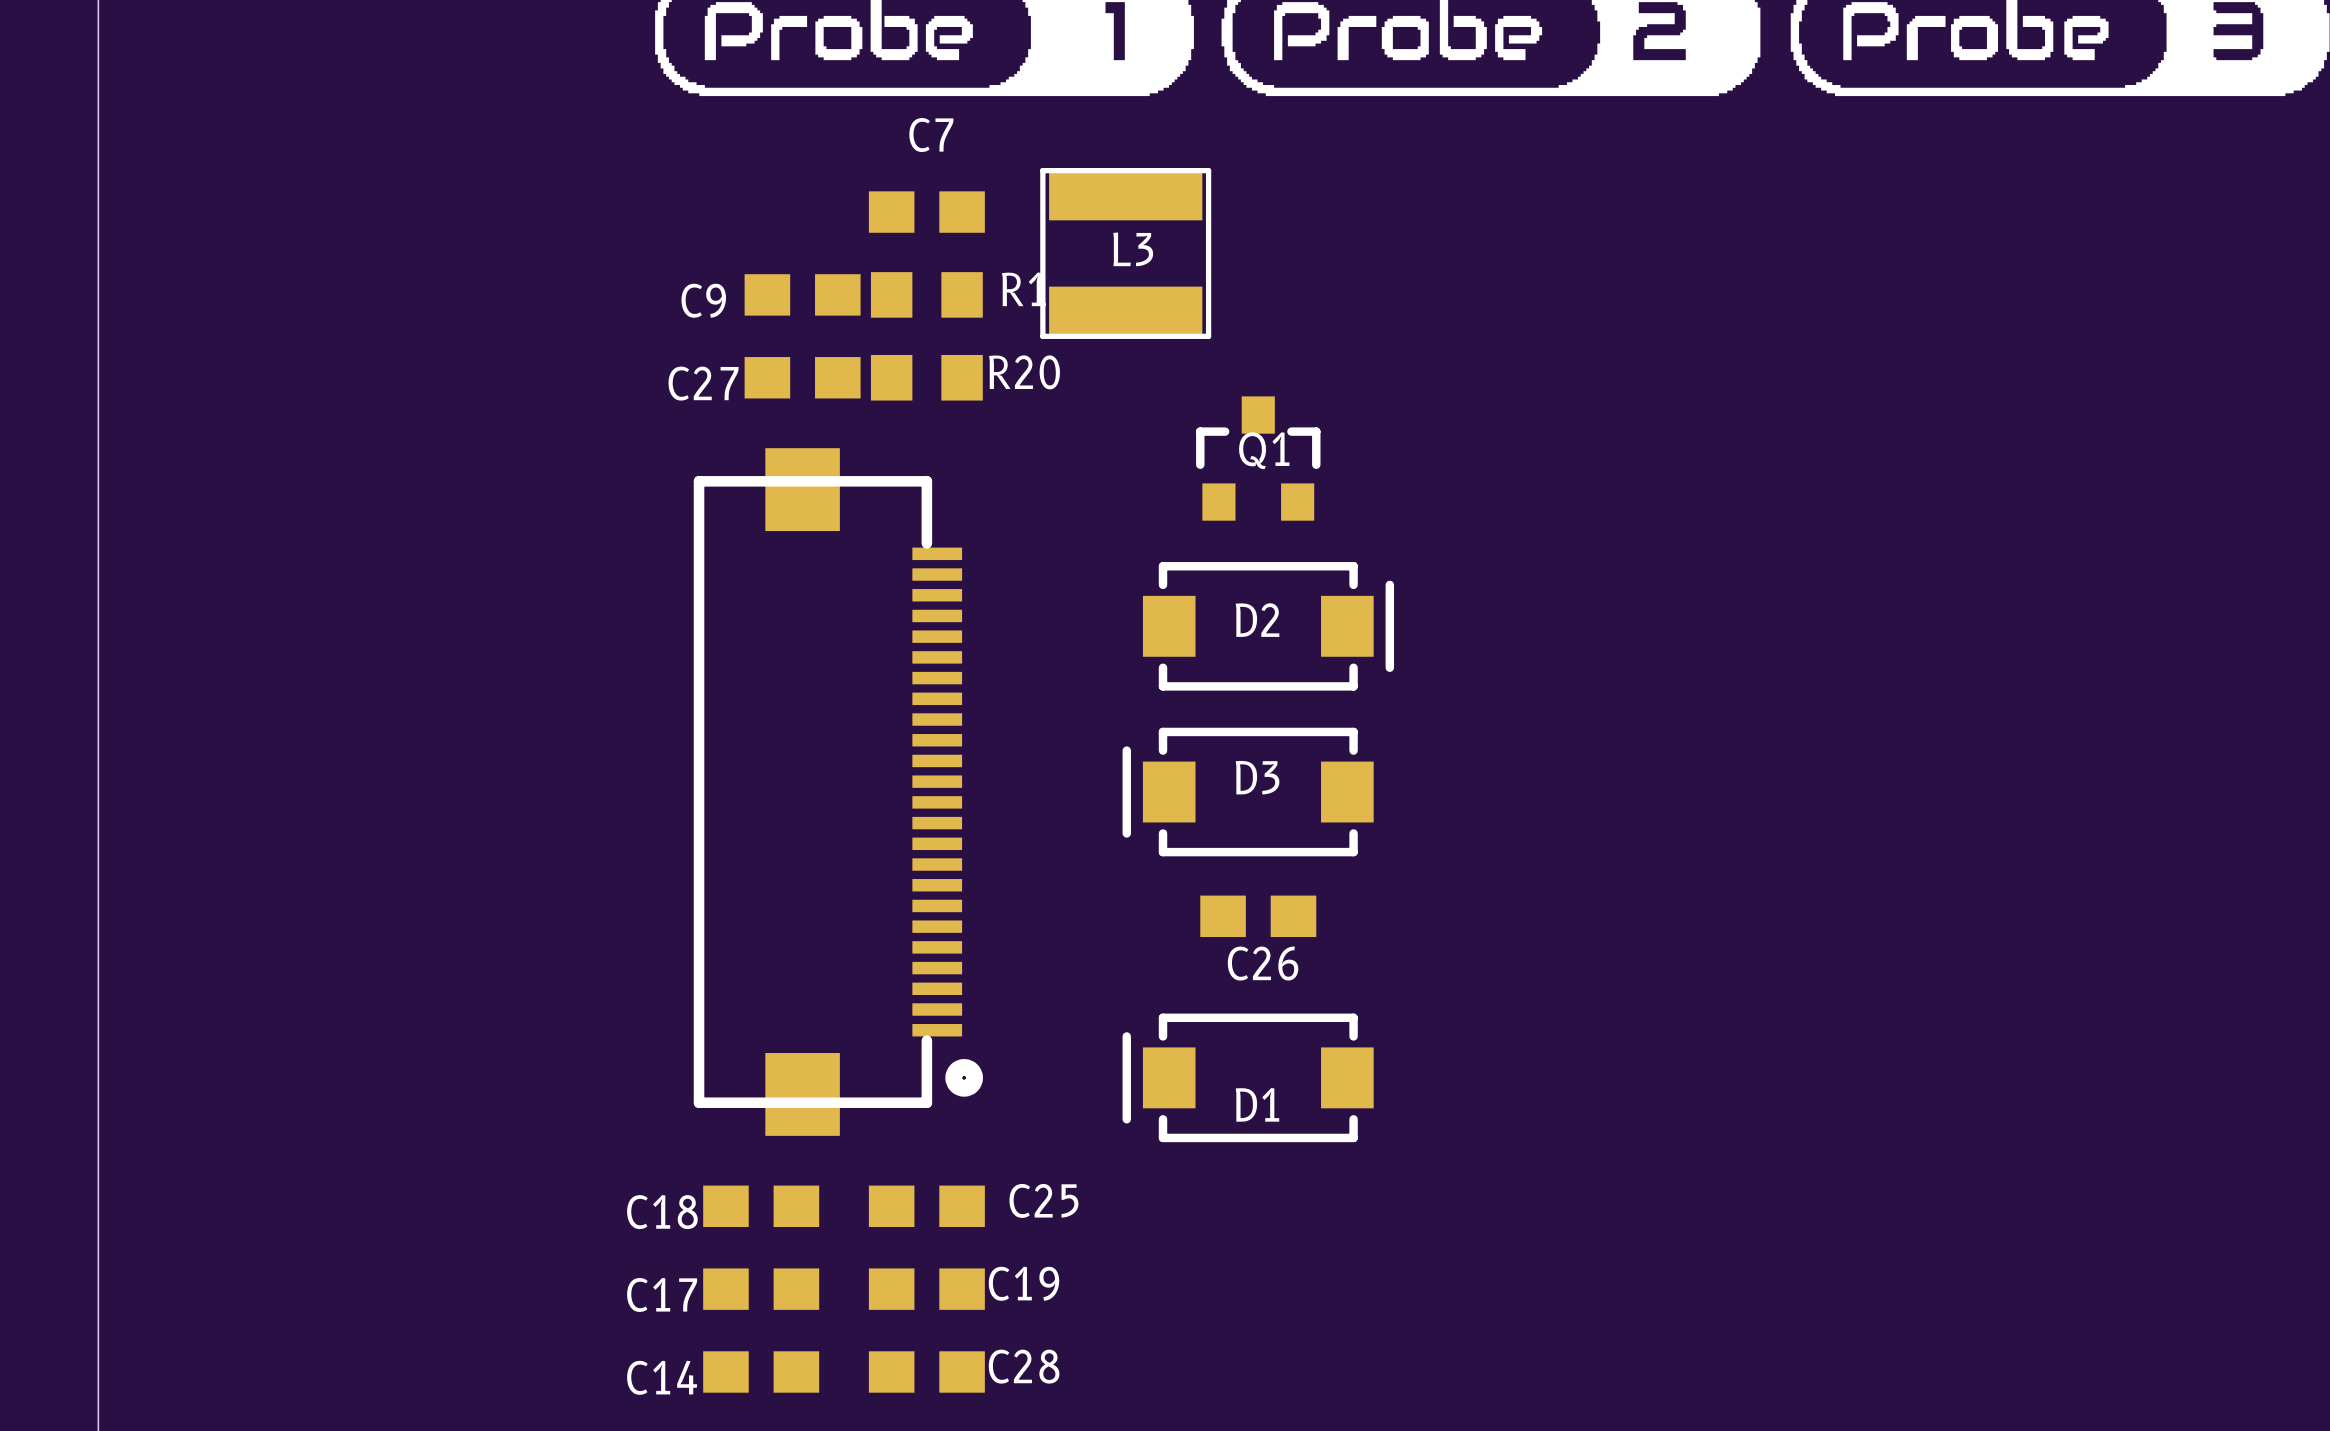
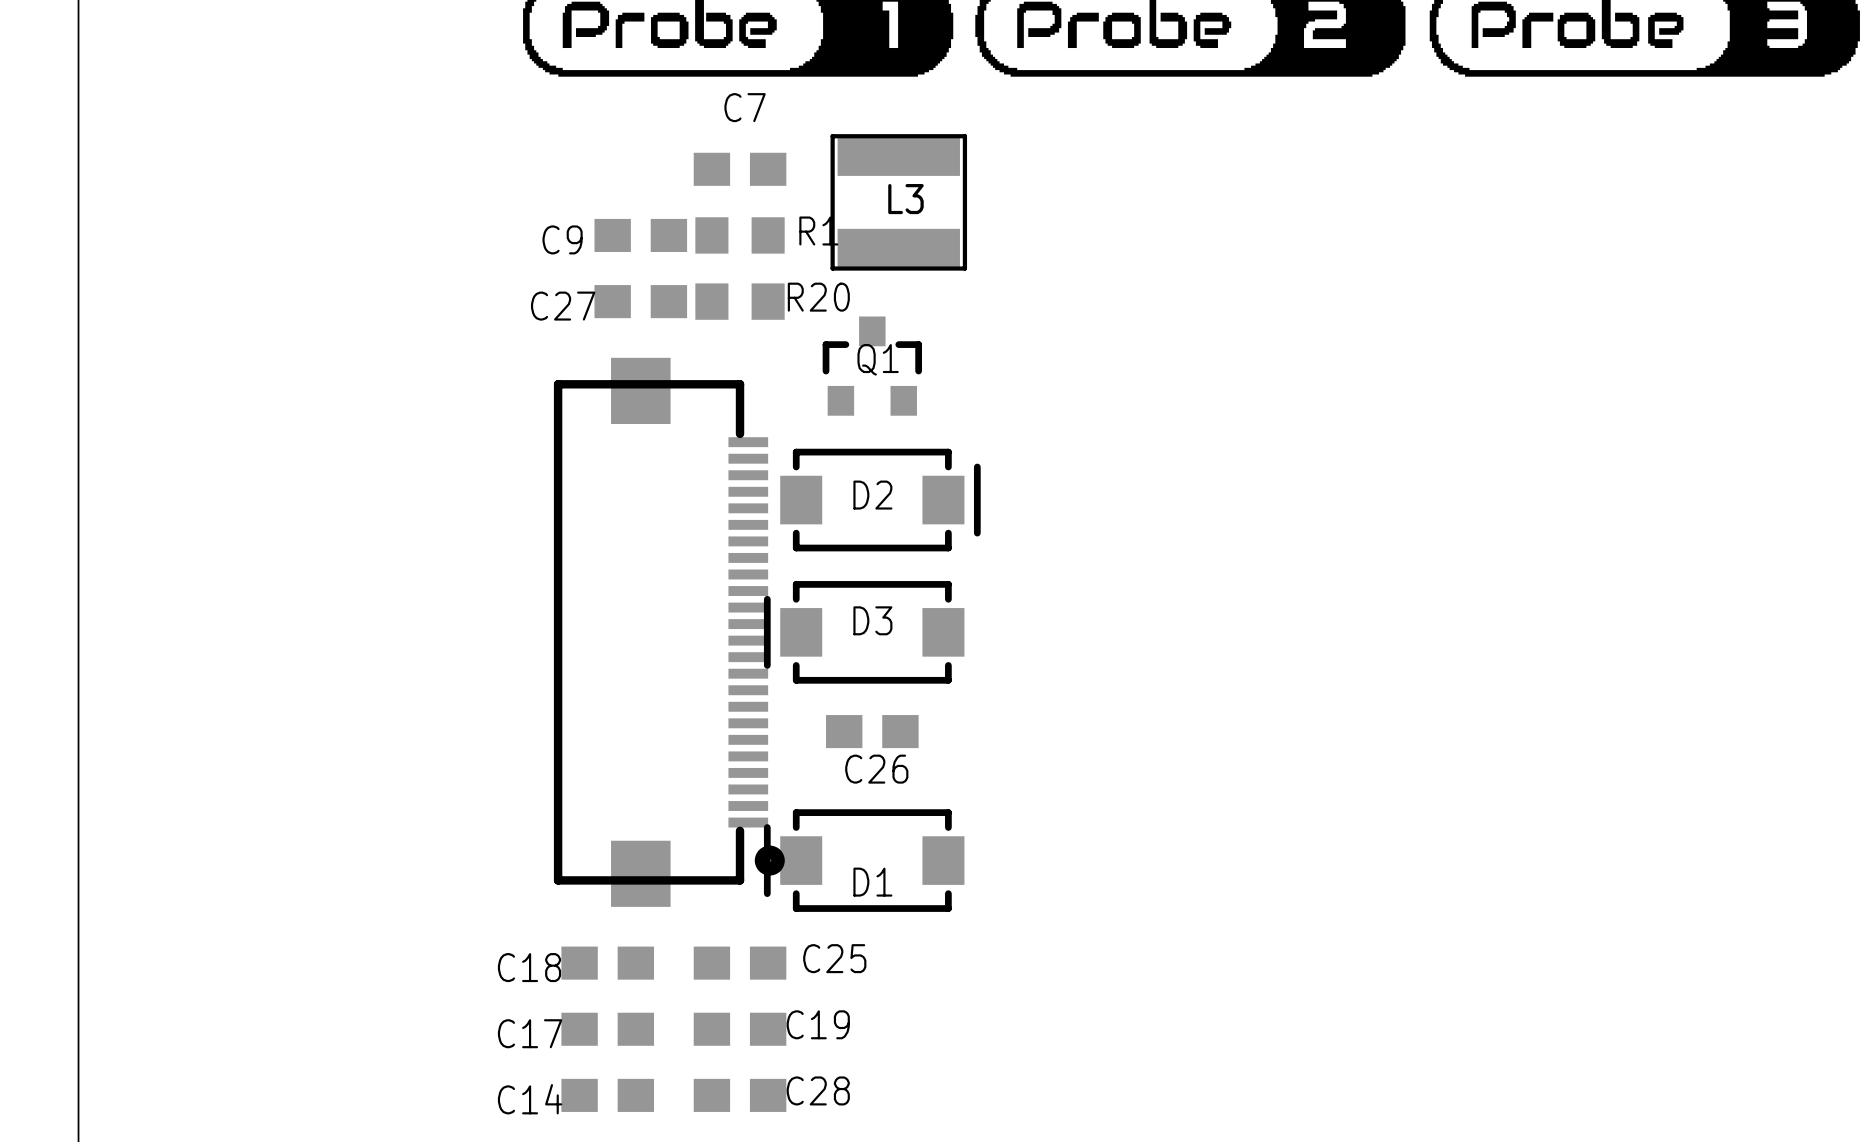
Q1 position: (1258, 458) -> (872, 366)
D2 position: (1268, 626) -> (880, 500)
D3 position: (1248, 792) -> (864, 632)
C26 position: (1258, 916) -> (872, 731)
D1 position: (1248, 1077) -> (864, 860)

